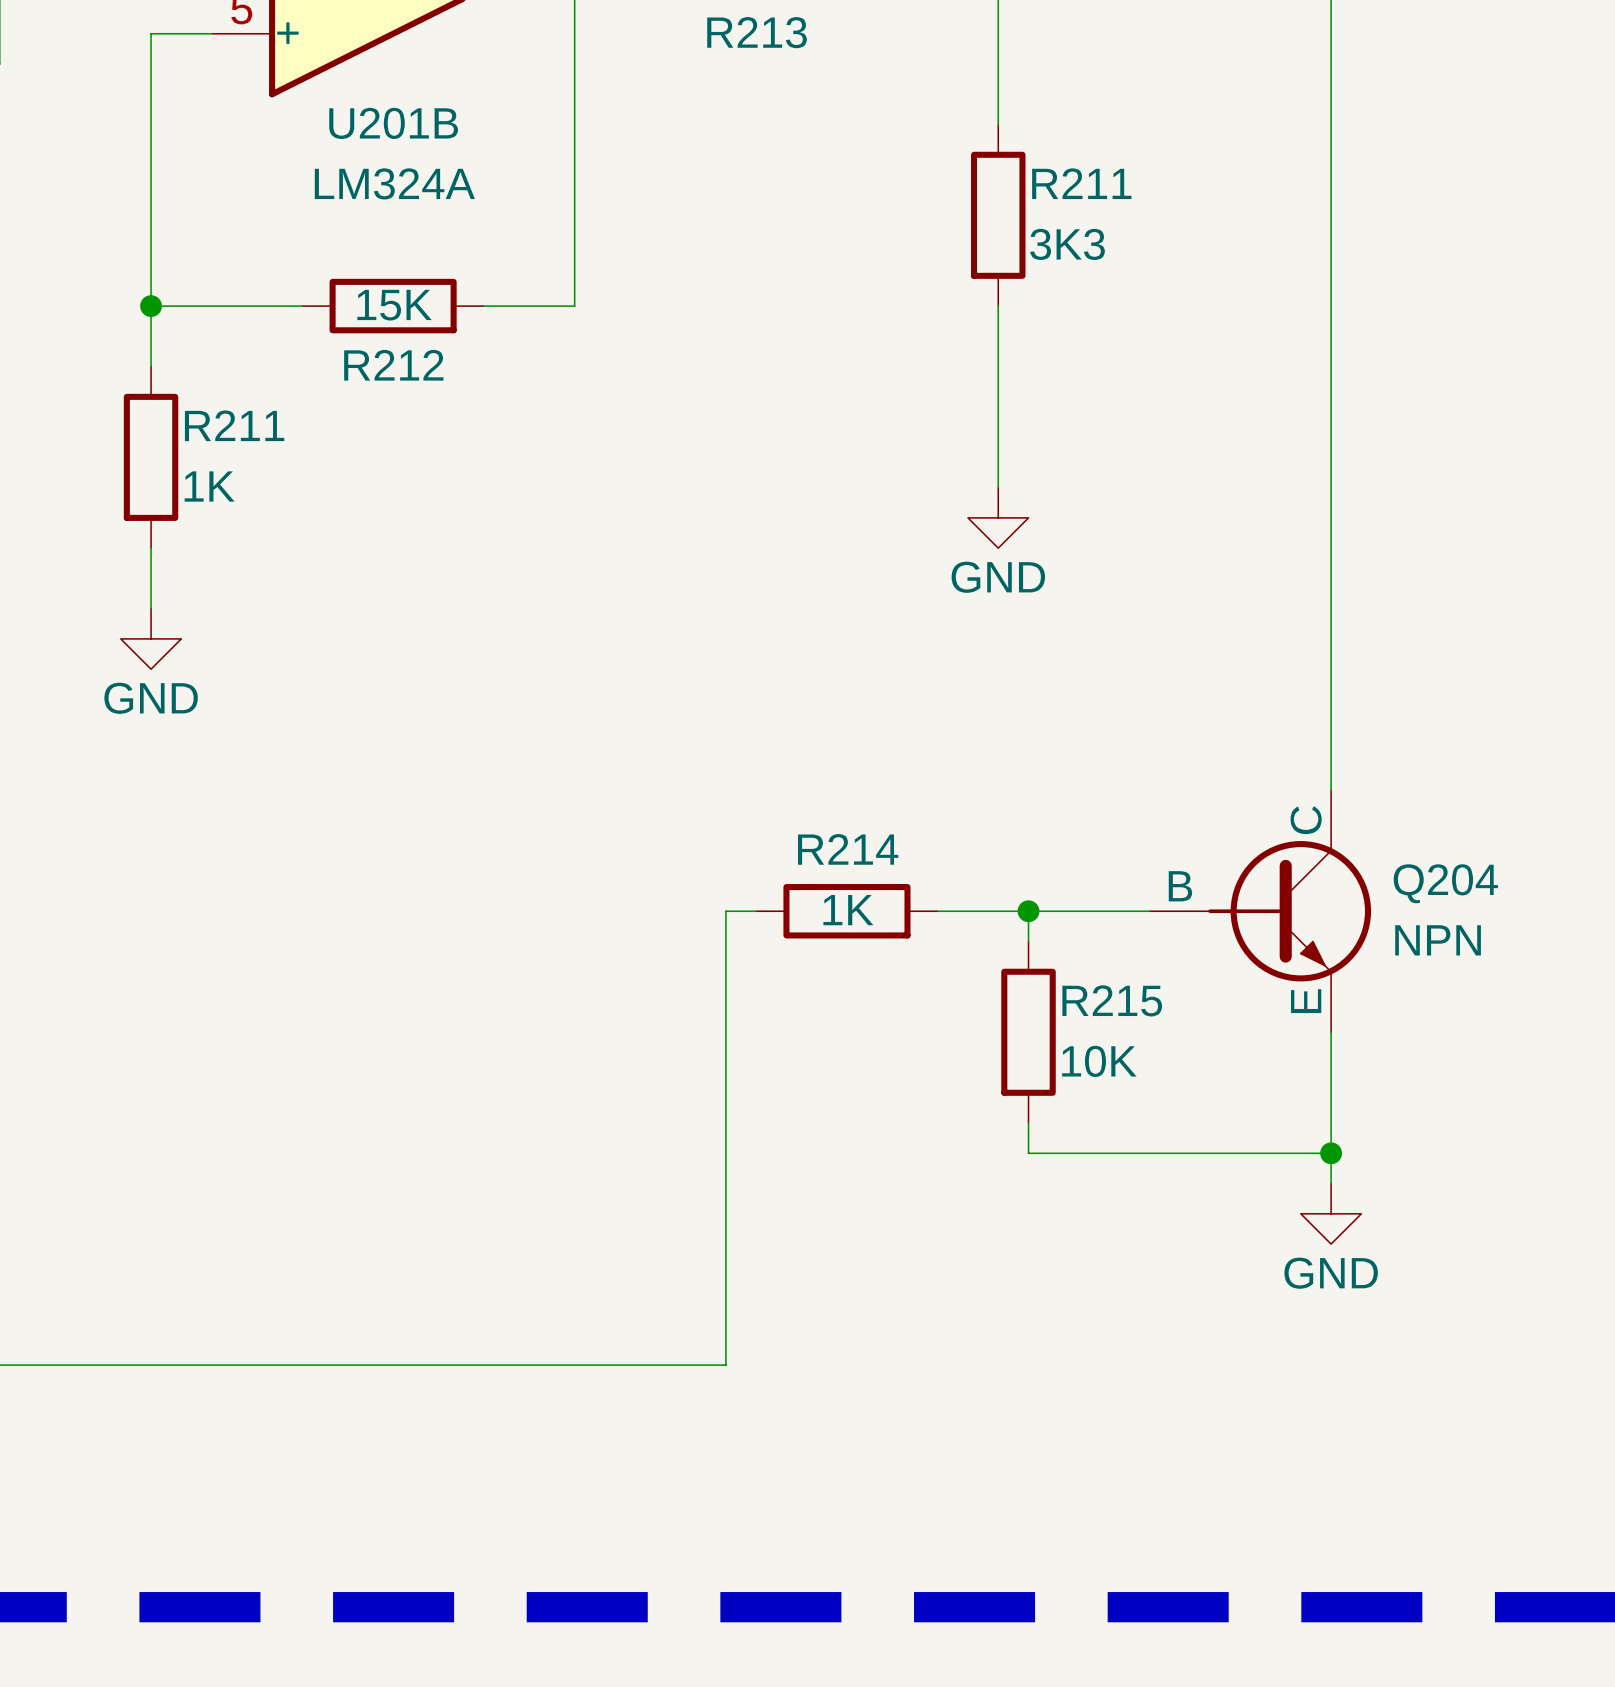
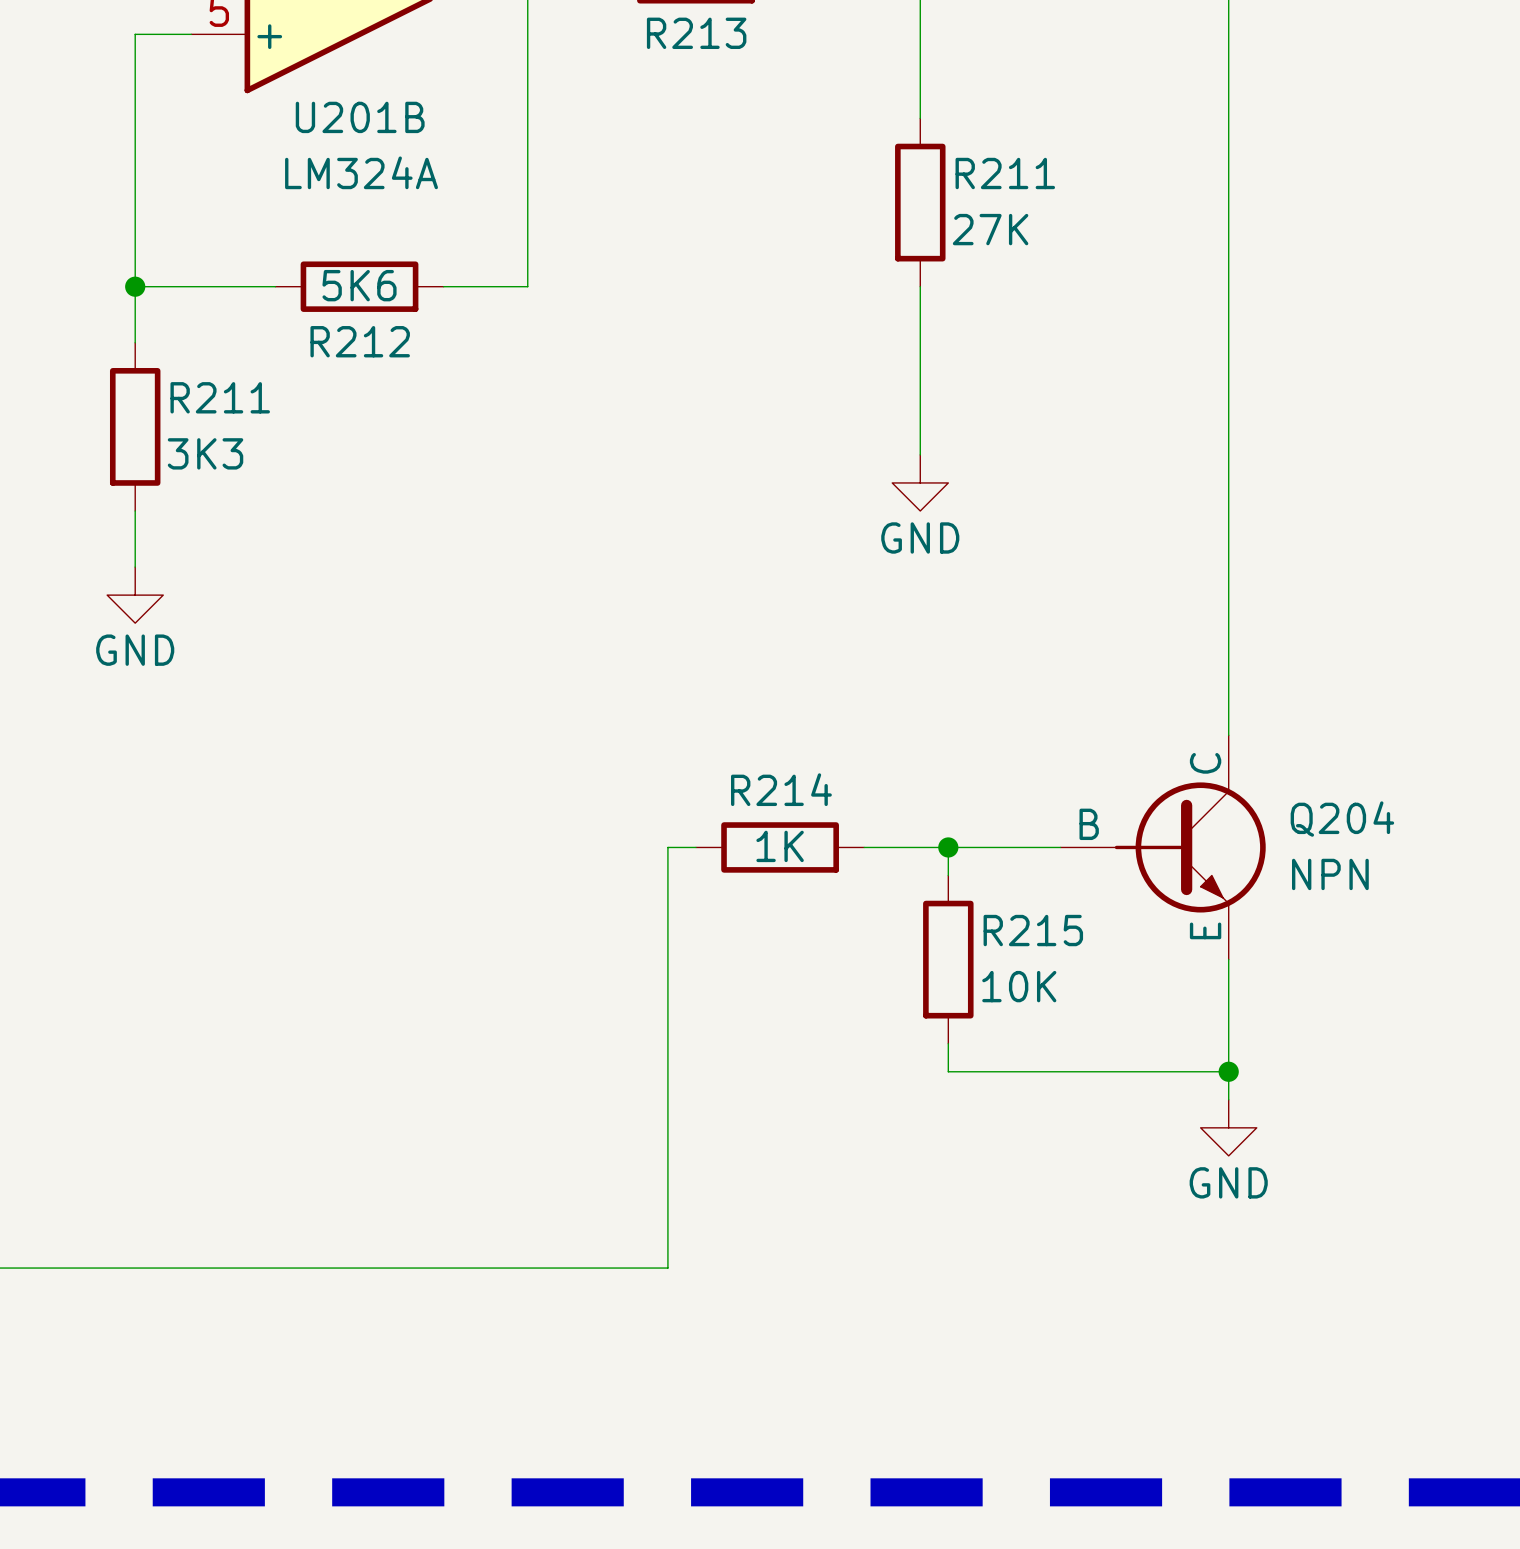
R211 value: 3K3 (1067, 244) -> 27K (990, 229)
R212 value: 15K (394, 305) -> 5K6 (359, 285)
R211 value: 1K (209, 486) -> 3K3 (205, 453)

